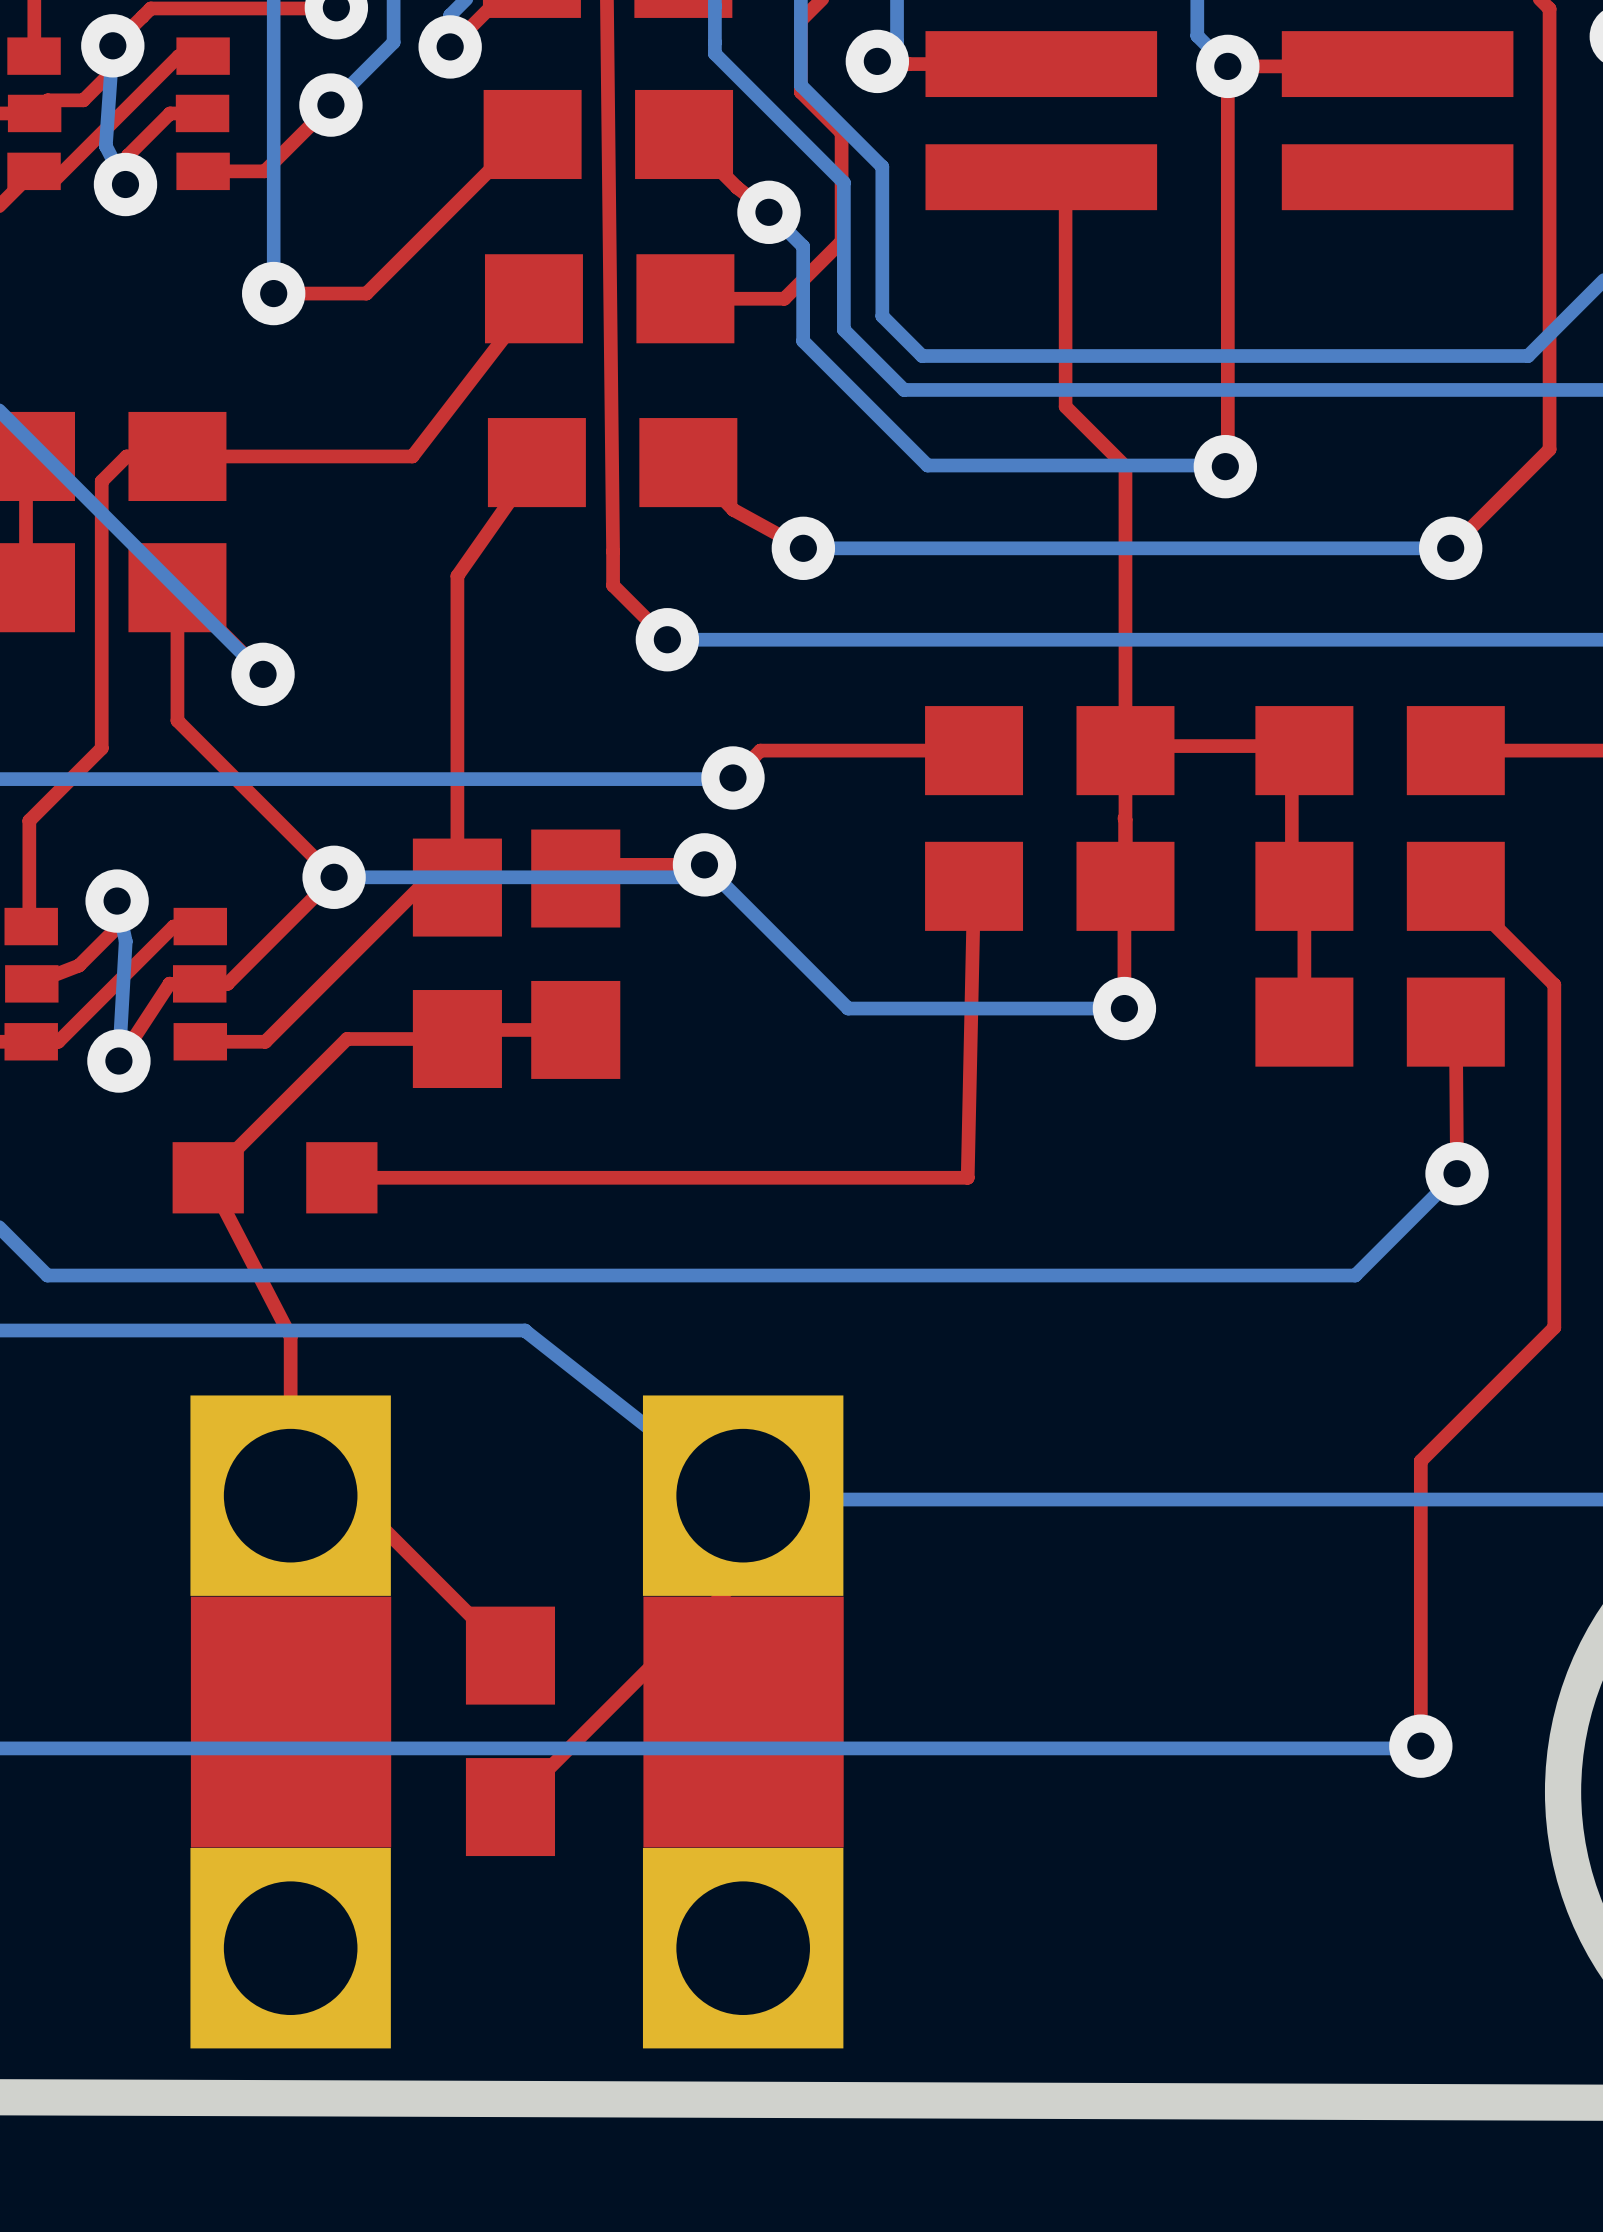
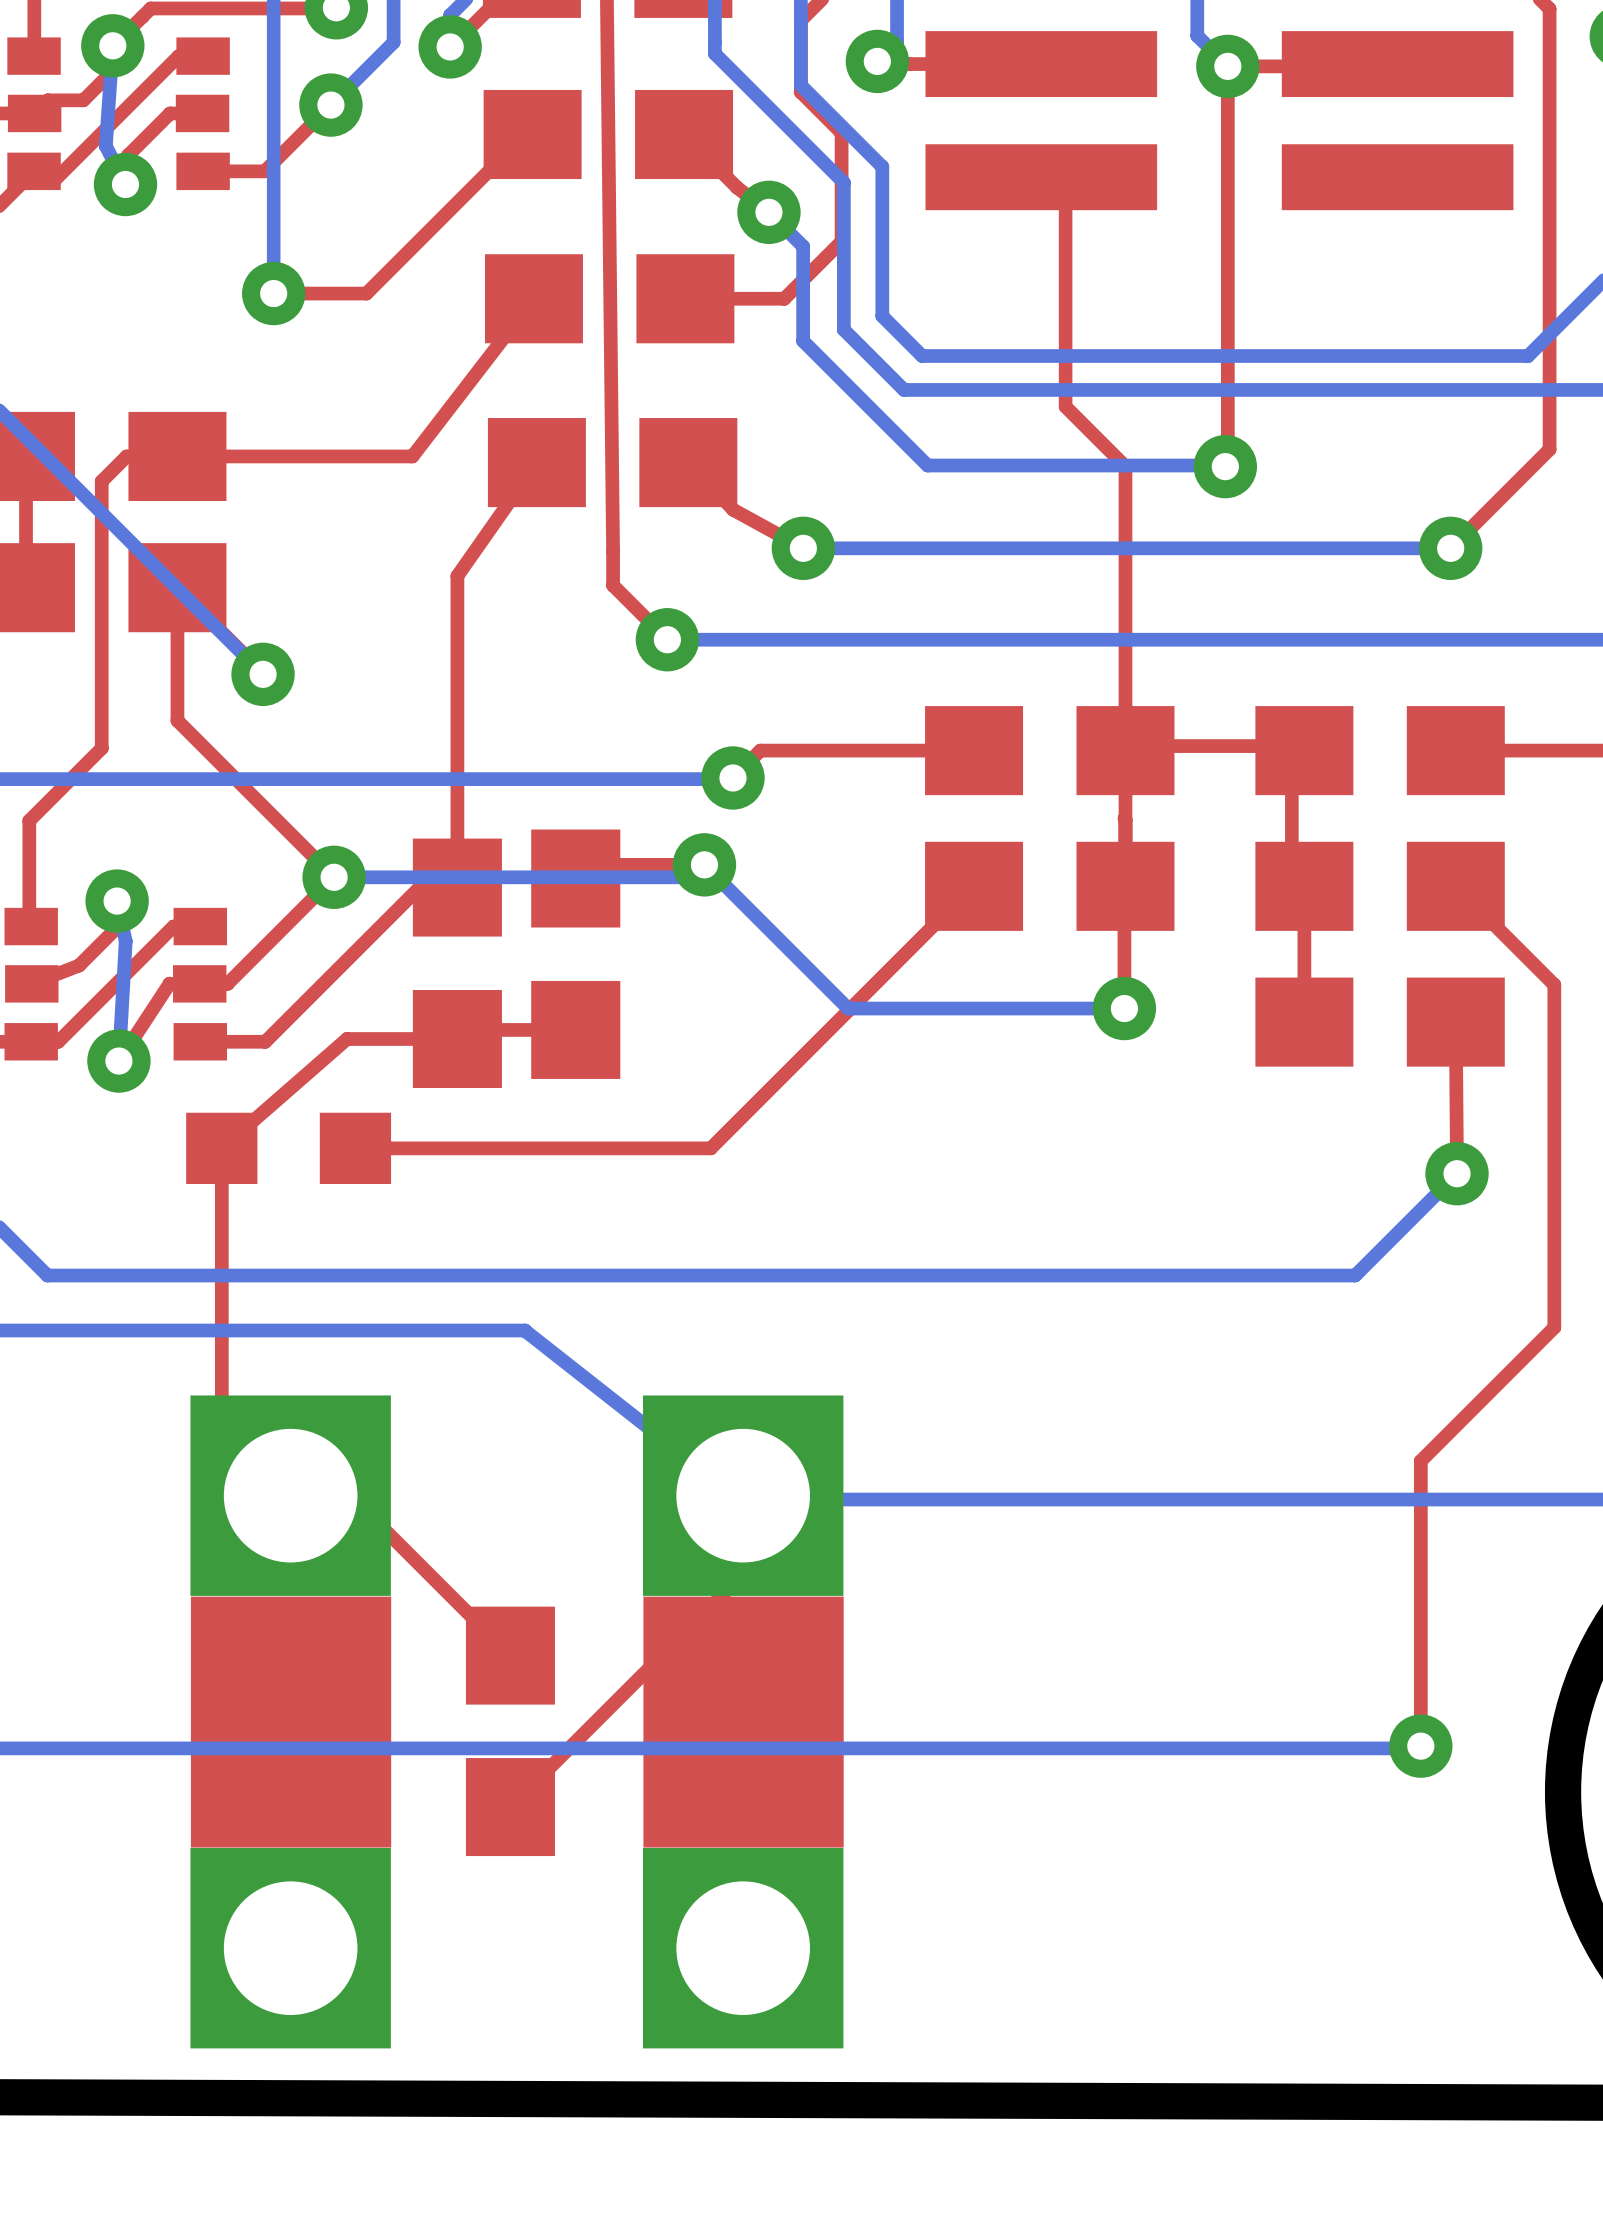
top track: (974, 886) (967, 1177) (341, 1177) -> (972, 886) (710, 1148) (355, 1148)
top track: (347, 1039) (208, 1177) (290, 1336) (290, 1495) -> (347, 1039) (221, 1148) (221, 1429) (289, 1497)
part position: (275, 1177) -> (288, 1148)

